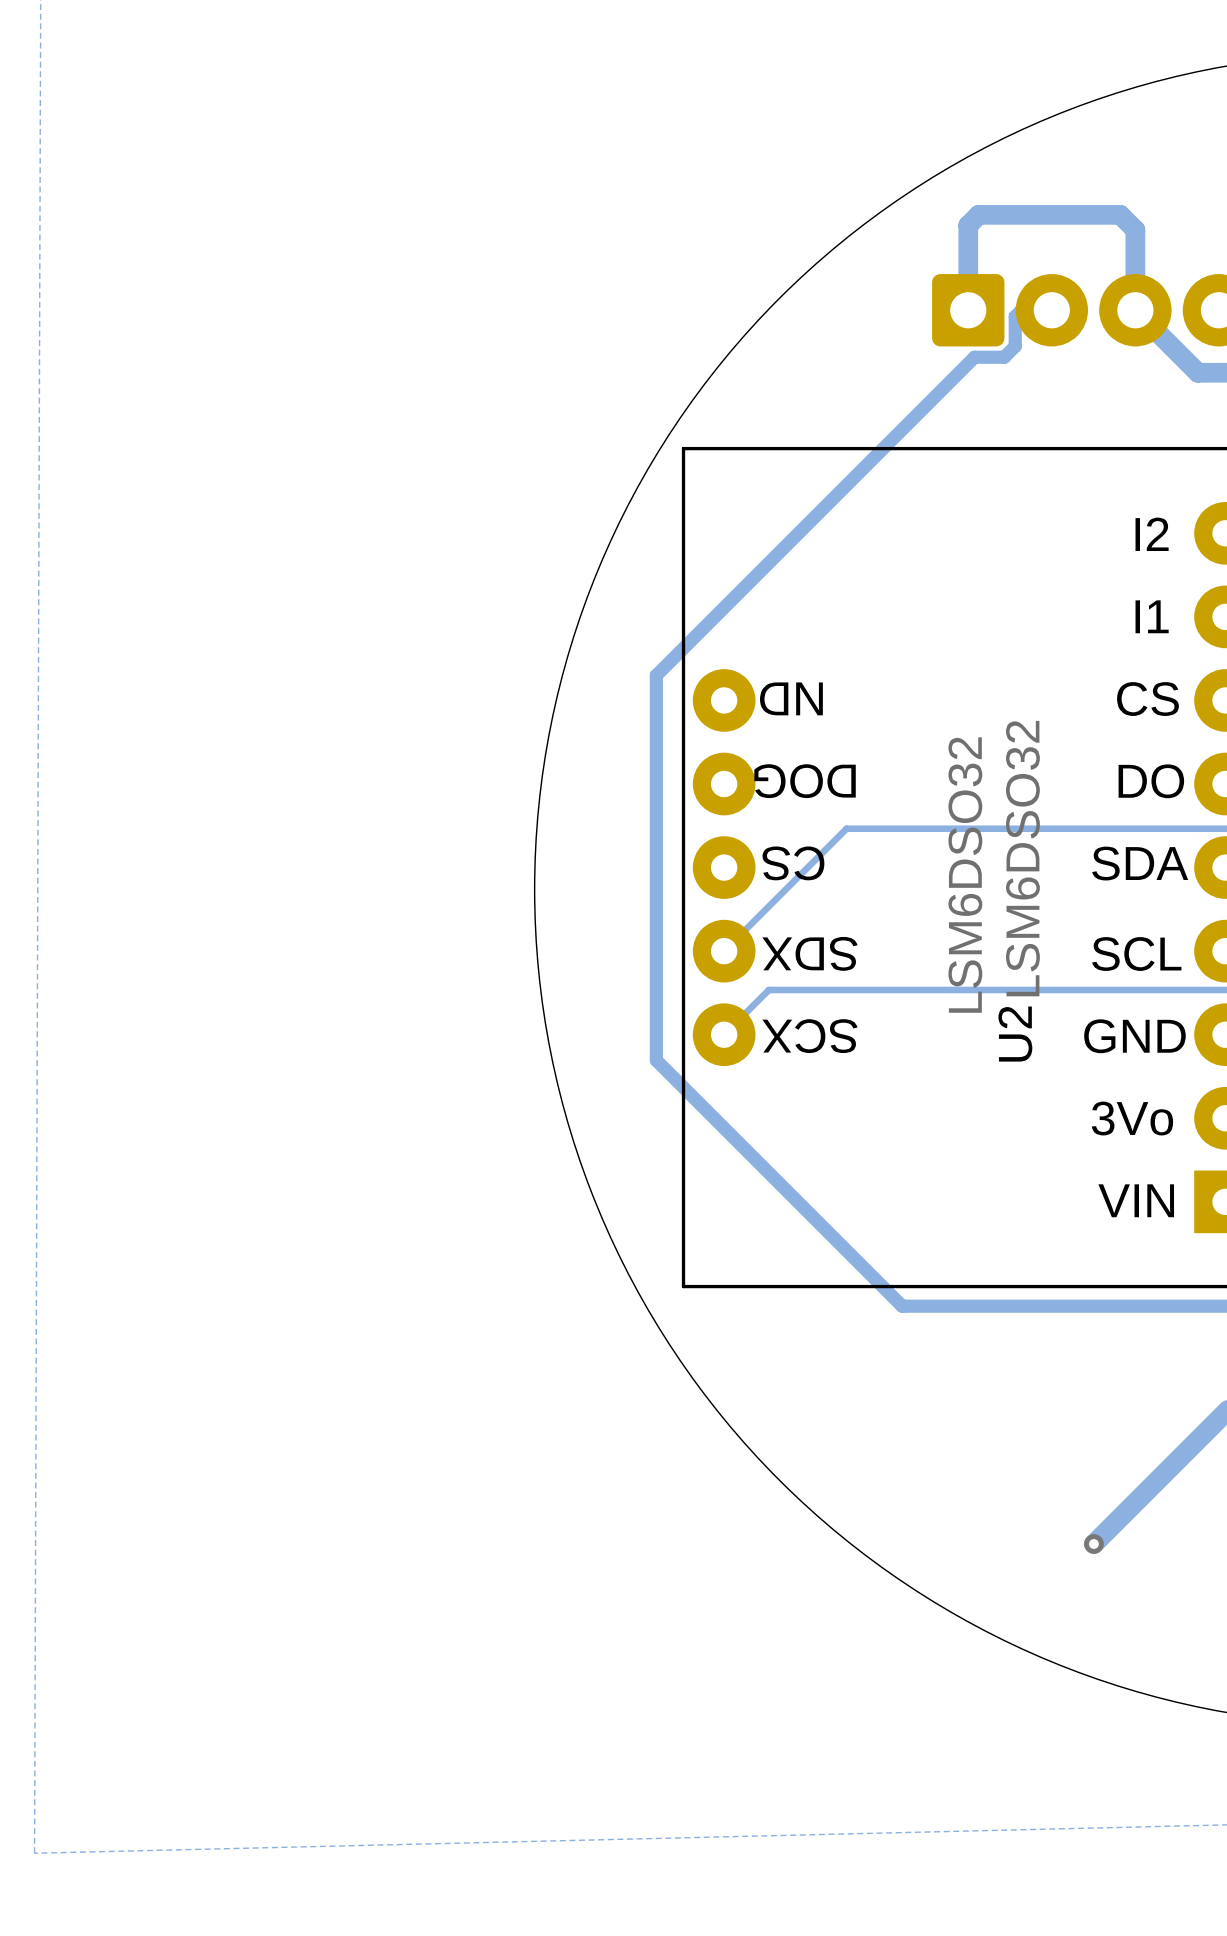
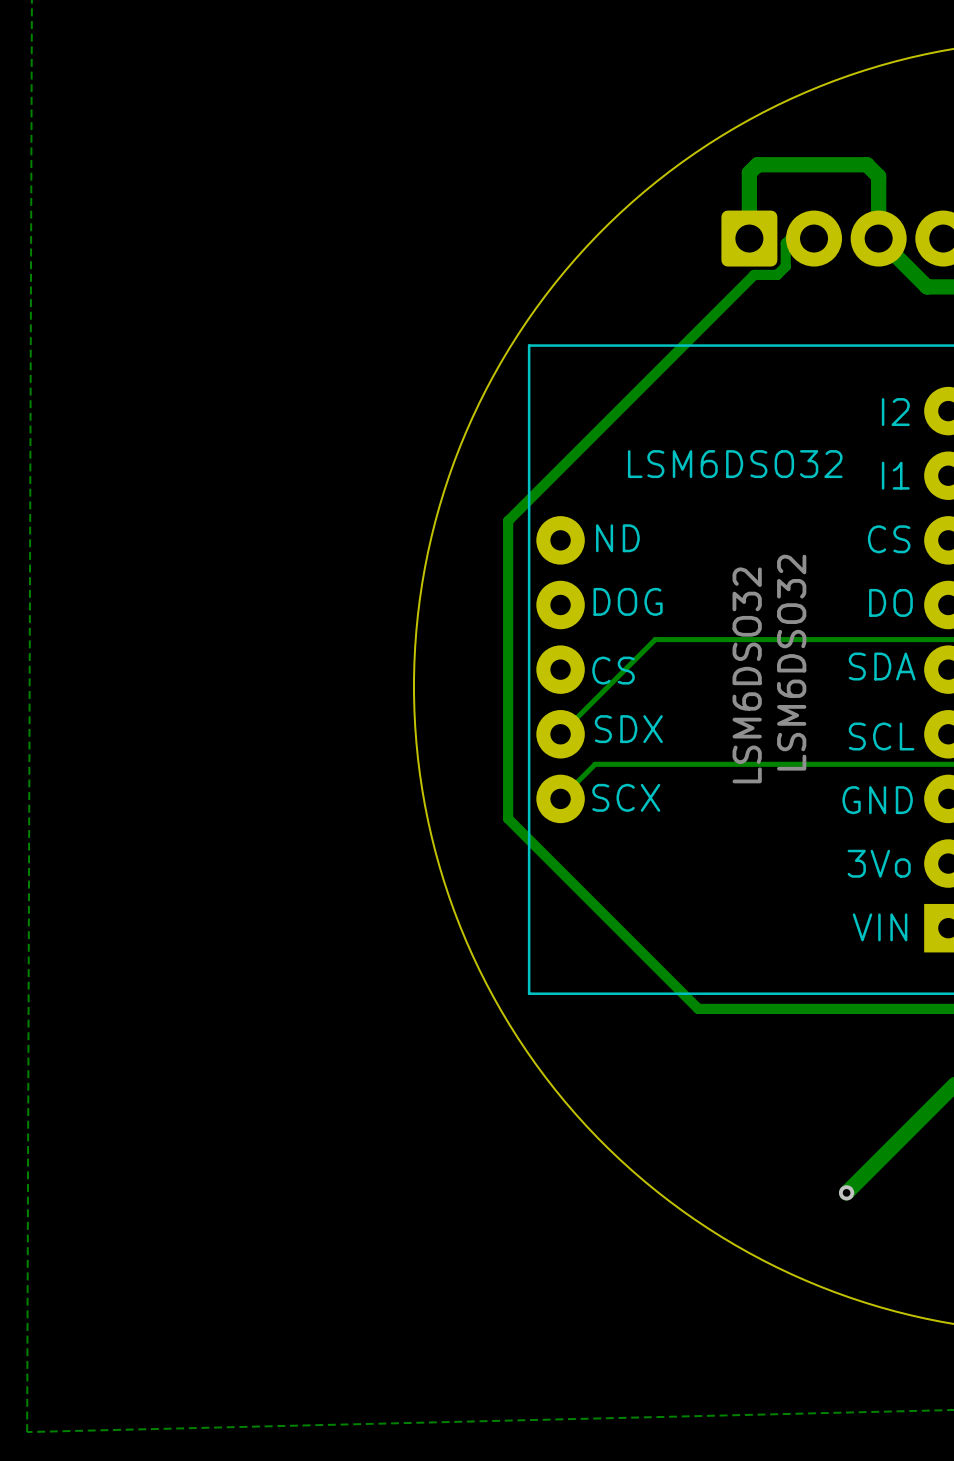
U2 text rotation: 0° (791, 698) -> 180° (617, 538)
U2 text rotation: 0° (805, 781) -> 180° (628, 601)
U2 text rotation: 0° (793, 863) -> 180° (613, 670)
U2 text rotation: 0° (809, 953) -> 180° (628, 729)
U2 name: U2 (1015, 1034) -> LSM6DSO32 (735, 464)
U2 text rotation: 0° (809, 1036) -> 180° (626, 797)

